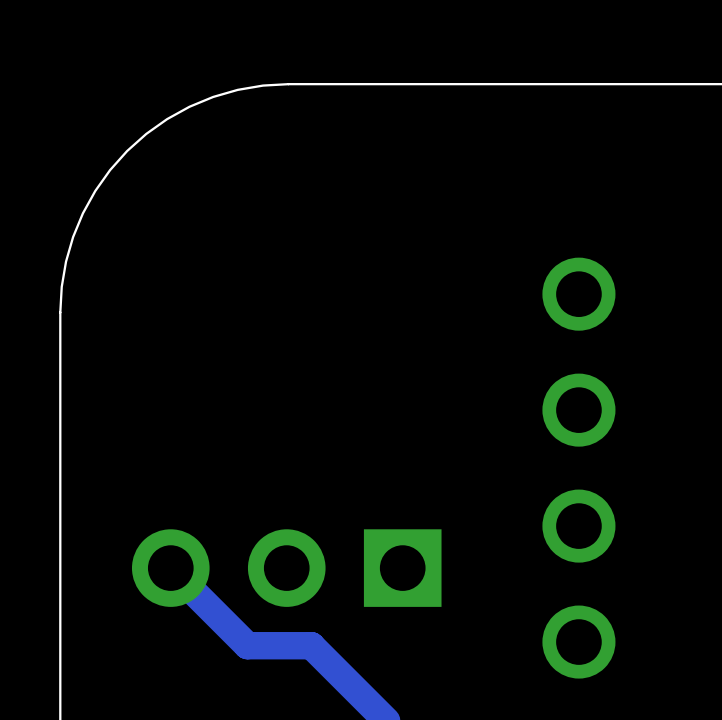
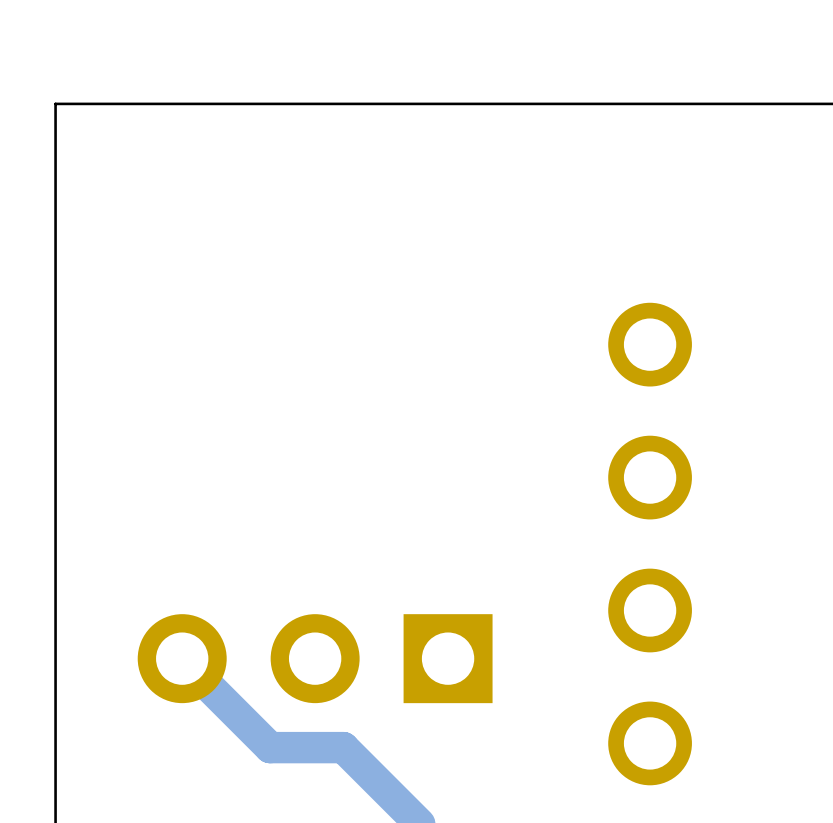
board edge: (288, 84) (263, 85) (213, 96) (167, 119) (127, 151) (95, 190) (73, 237) (61, 286) (60, 312) -> (317, 103) (55, 103) (55, 365)

